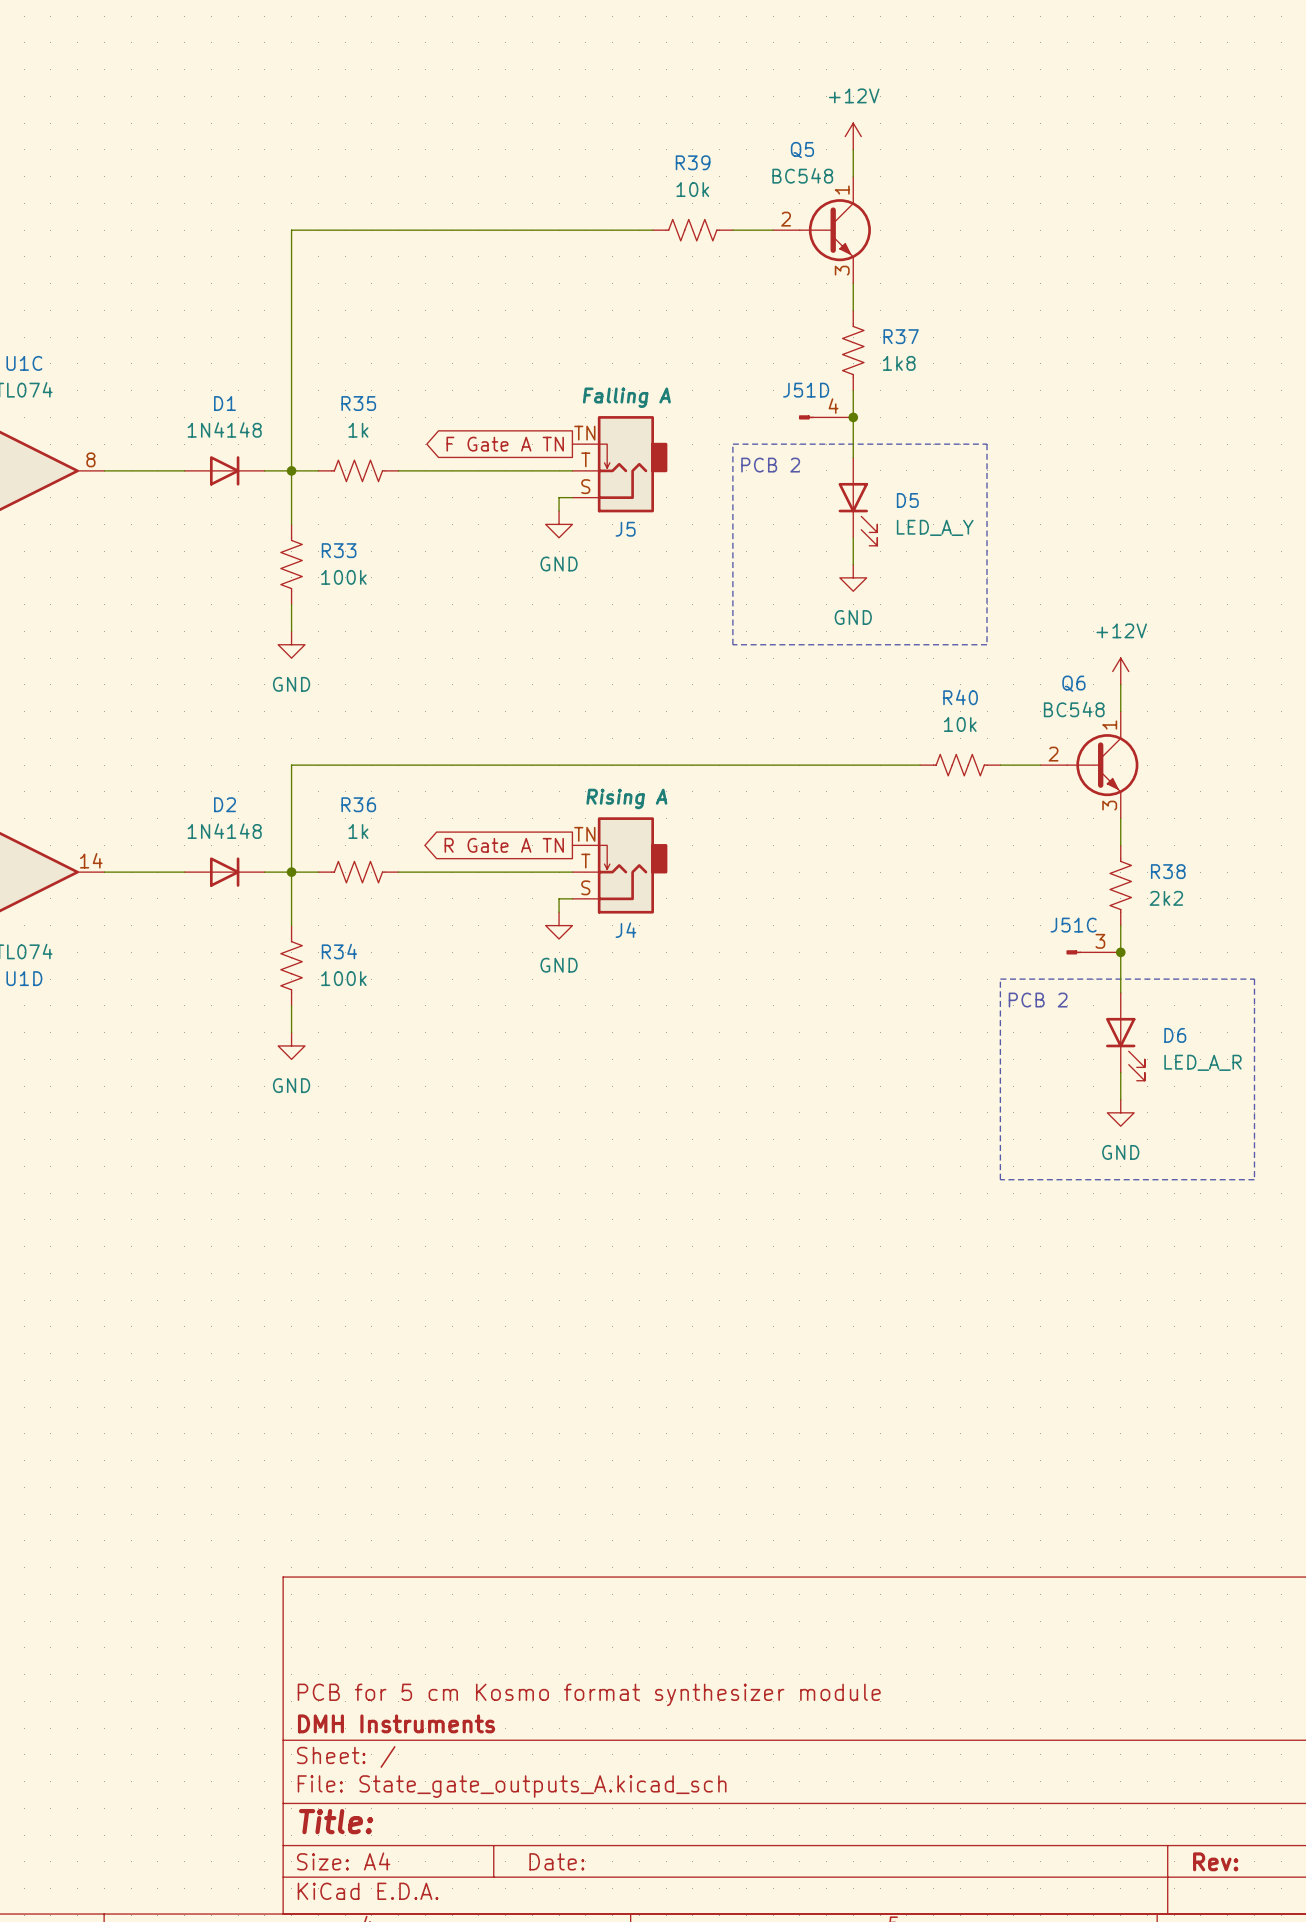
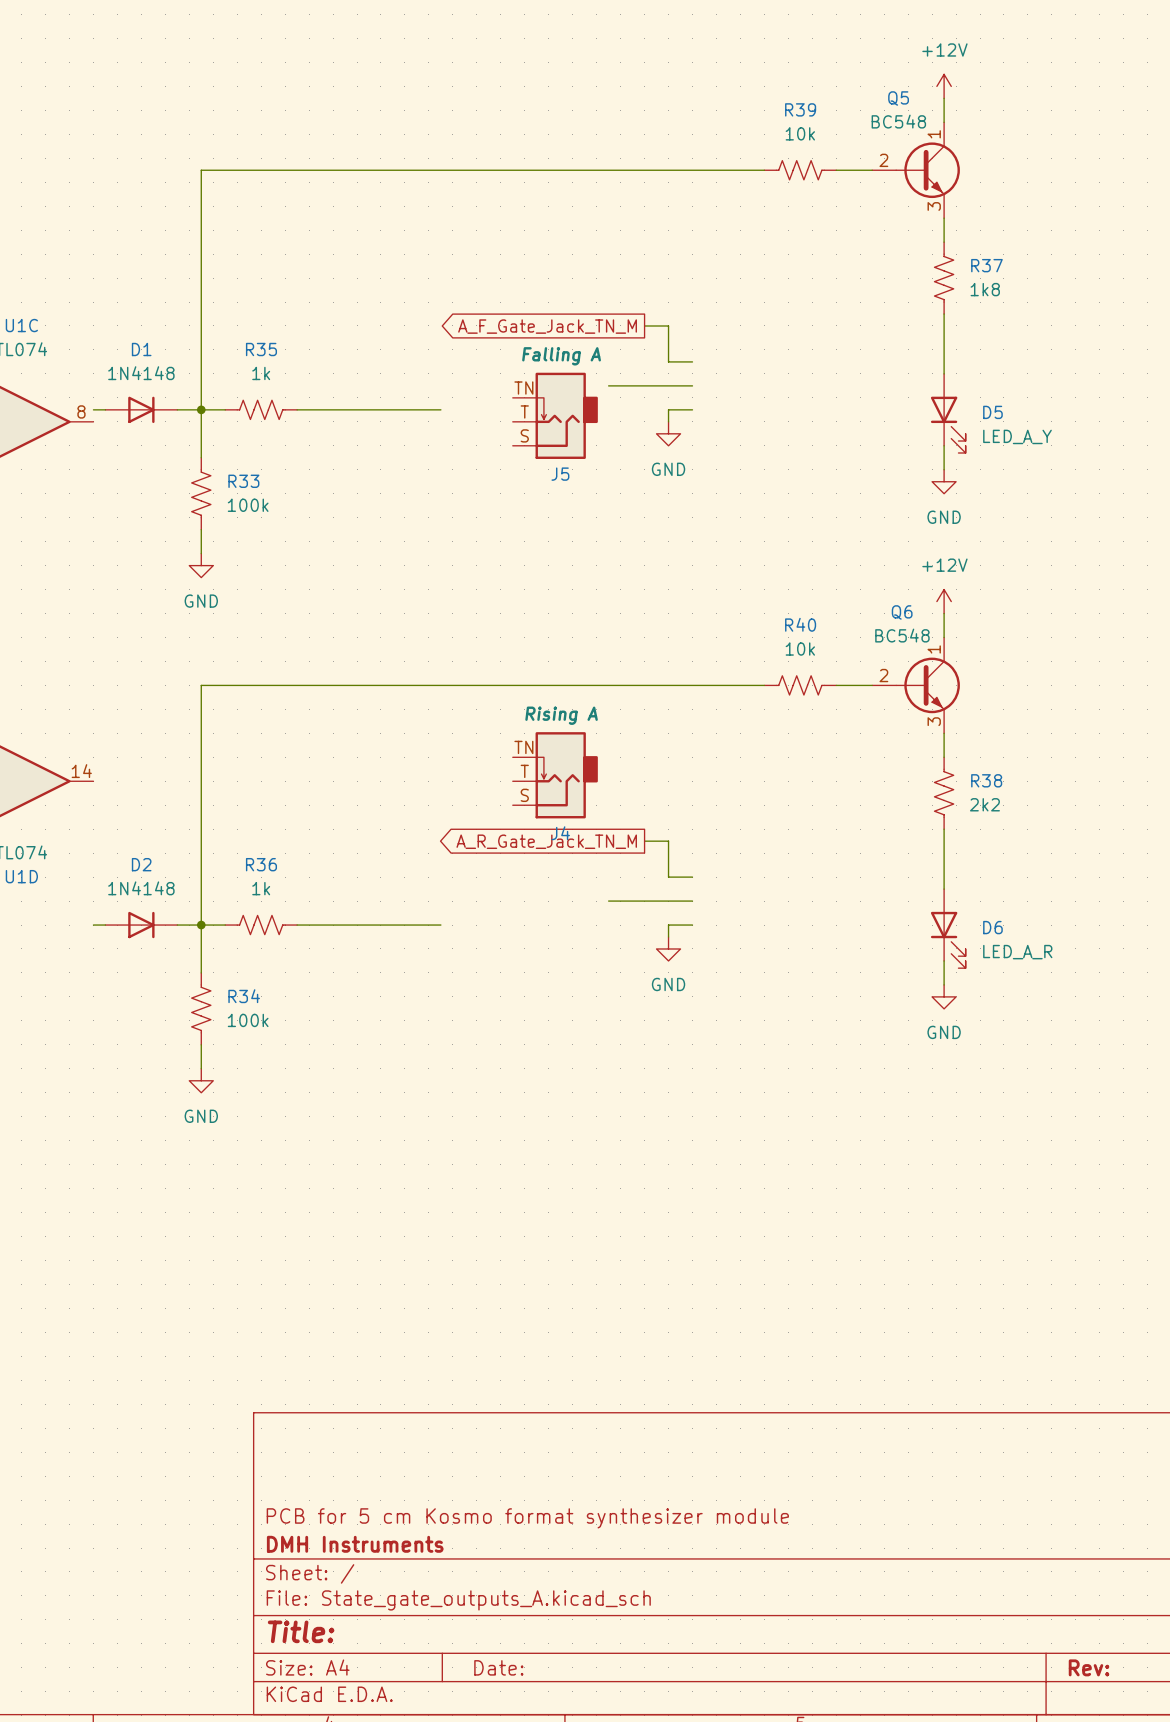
power symbol position: +12V (853, 136) -> +12V (944, 86)
wire: (853, 149) (853, 176) -> (944, 98) (944, 122)
wire: none -> (764, 170) (201, 170) (201, 457)
wire: (652, 230) (291, 230) (291, 524) -> none
R39 position: (692, 230) -> (800, 170)
wire: (732, 230) (773, 230) -> (836, 170) (872, 170)
Q5 position: (821, 230) -> (916, 170)
wire: (853, 283) (853, 310) -> (944, 218) (944, 242)
R37 position: (853, 350) -> (944, 278)
wire: none -> (644, 325) (668, 325) (668, 361) (692, 361)
global label: none -> A_F_Gate_Jack_TN_M (547, 326)
wire: (853, 390) (853, 457) -> (944, 314) (944, 373)
J51D: (826, 417) -> none
junction: (853, 417) -> none
wire: none -> (608, 385) (692, 385)
global label: F Gate A TN (505, 444) -> none
line: (732, 444) (987, 444) (987, 644) (732, 644) (732, 444) -> none
wire: none -> (93, 409) (105, 409)
junction: none -> (201, 409)
wire: none -> (297, 409) (440, 409)
wire: none -> (692, 409) (668, 409) (668, 421)
text: PCB 2 (770, 465) -> none
wire: (104, 470) (184, 470) -> none
D1 position: (224, 470) -> (141, 409)
wire: (264, 470) (318, 470) -> (177, 409) (225, 409)
junction: (291, 470) -> none
R35 position: (358, 470) -> (261, 409)
wire: (398, 470) (572, 470) -> none
power symbol: none -> GND (668, 433)
wire: (572, 497) (559, 497) (559, 511) -> none
D5 position: (857, 501) -> (948, 413)
power symbol: GND (559, 524) -> none
wire: (853, 537) (853, 564) -> (944, 445) (944, 469)
power symbol: none -> GND (944, 481)
R33 position: (291, 564) -> (201, 493)
power symbol: GND (853, 577) -> none
wire: (291, 604) (291, 631) -> (201, 529) (201, 553)
power symbol position: GND (291, 644) -> GND (201, 565)
power symbol position: +12V (1120, 671) -> +12V (944, 601)
wire: (1120, 684) (1120, 711) -> (944, 613) (944, 637)
wire: (291, 765) (291, 925) -> (261, 685) (201, 685) (201, 972)
wire: (853, 765) (920, 765) -> none
R40 position: (960, 765) -> (800, 685)
Q6 position: (1089, 765) -> (916, 685)
wire: (1120, 818) (1120, 845) -> (944, 733) (944, 757)
global label: R Gate A TN (504, 845) -> none
wire: (104, 872) (184, 872) -> none
D2 position: (224, 872) -> (141, 925)
wire: (264, 872) (318, 872) -> (177, 925) (225, 925)
junction: (291, 872) -> none
R36 position: (358, 872) -> (261, 925)
wire: (398, 872) (572, 872) -> none
R38 position: (1120, 885) -> (944, 793)
wire: (572, 898) (559, 898) (559, 912) -> none
power symbol: GND (559, 925) -> none
wire: (1120, 925) (1120, 992) -> (944, 829) (944, 889)
wire: none -> (644, 841) (668, 841) (668, 877) (692, 877)
global label: none -> A_R_Gate_Jack_TN_M (546, 841)
J51C: (1093, 952) -> none
junction: (1120, 952) -> none
R34 position: (291, 965) -> (201, 1008)
line: (1000, 979) (1254, 979) (1254, 1179) (1000, 1179) (1000, 979) -> none
text: PCB 2 (1038, 1000) -> none
wire: (291, 1005) (291, 1032) -> (201, 1044) (201, 1068)
wire: none -> (608, 901) (692, 901)
wire: none -> (93, 925) (105, 925)
junction: none -> (201, 925)
wire: none -> (297, 925) (440, 925)
wire: none -> (692, 925) (668, 925) (668, 937)
D6 position: (1125, 1036) -> (948, 928)
power symbol position: GND (291, 1045) -> GND (201, 1080)
power symbol: none -> GND (668, 948)
wire: (1120, 1072) (1120, 1099) -> (944, 960) (944, 984)
power symbol position: GND (1120, 1112) -> GND (944, 996)

